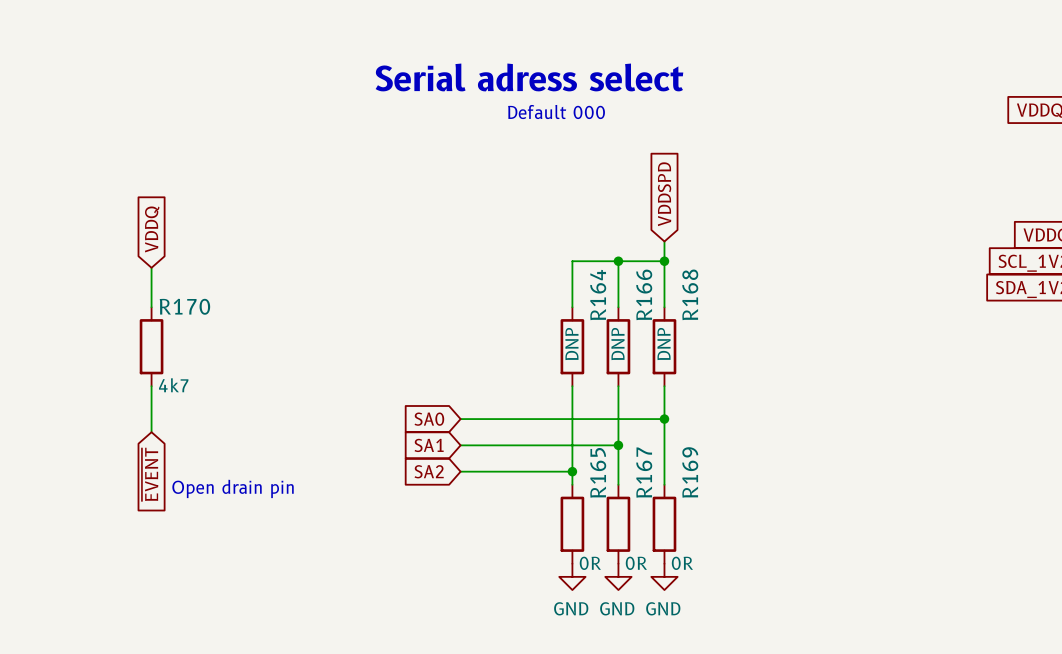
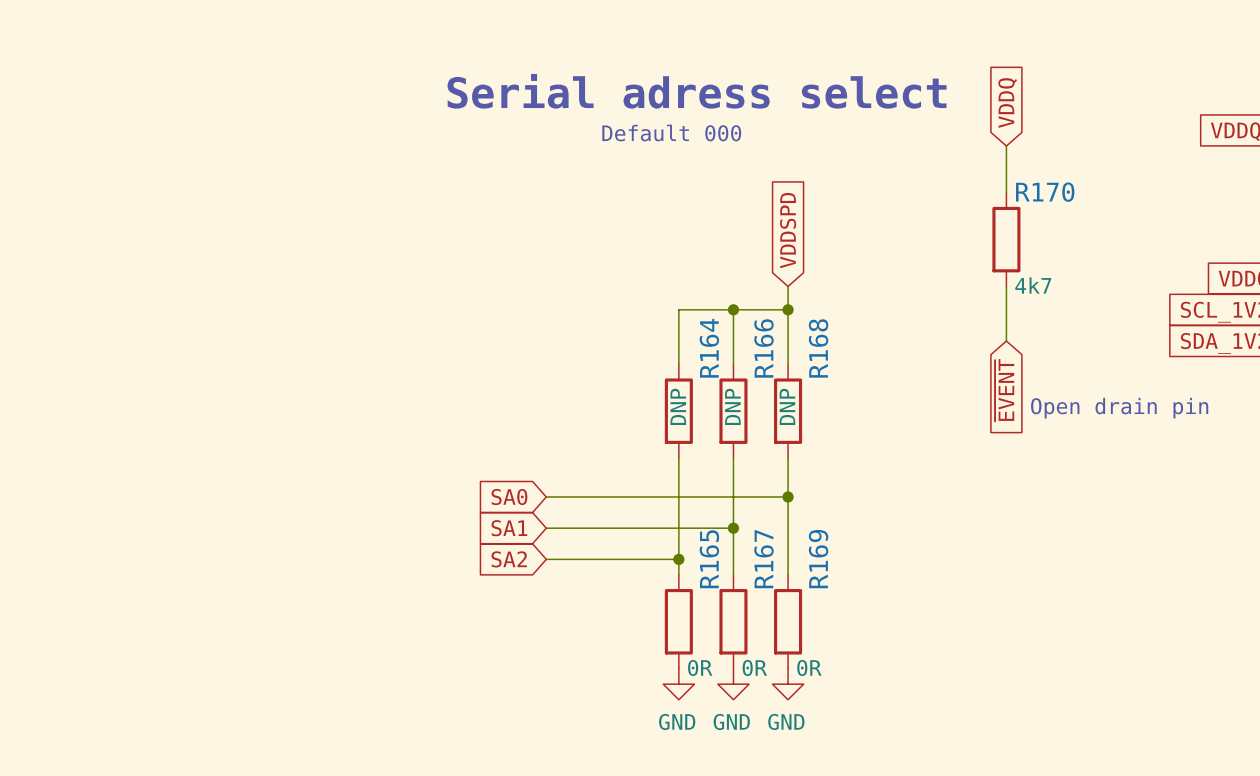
global label: none -> VDDQ (1007, 103)
wire: none -> (1006, 146) (1006, 192)
global label: VDDQ (152, 229) -> none
wire: none -> (1006, 286) (1006, 341)
wire: (151, 267) (151, 307) -> none
global label: none -> ~{EVENT} (1004, 390)
text: none -> Open drain pin (1119, 408)
R170 position: (151, 346) -> (1006, 239)
wire: (151, 386) (151, 432) -> none
global label: ~{EVENT} (150, 474) -> none
text: Open drain pin (233, 488) -> none

